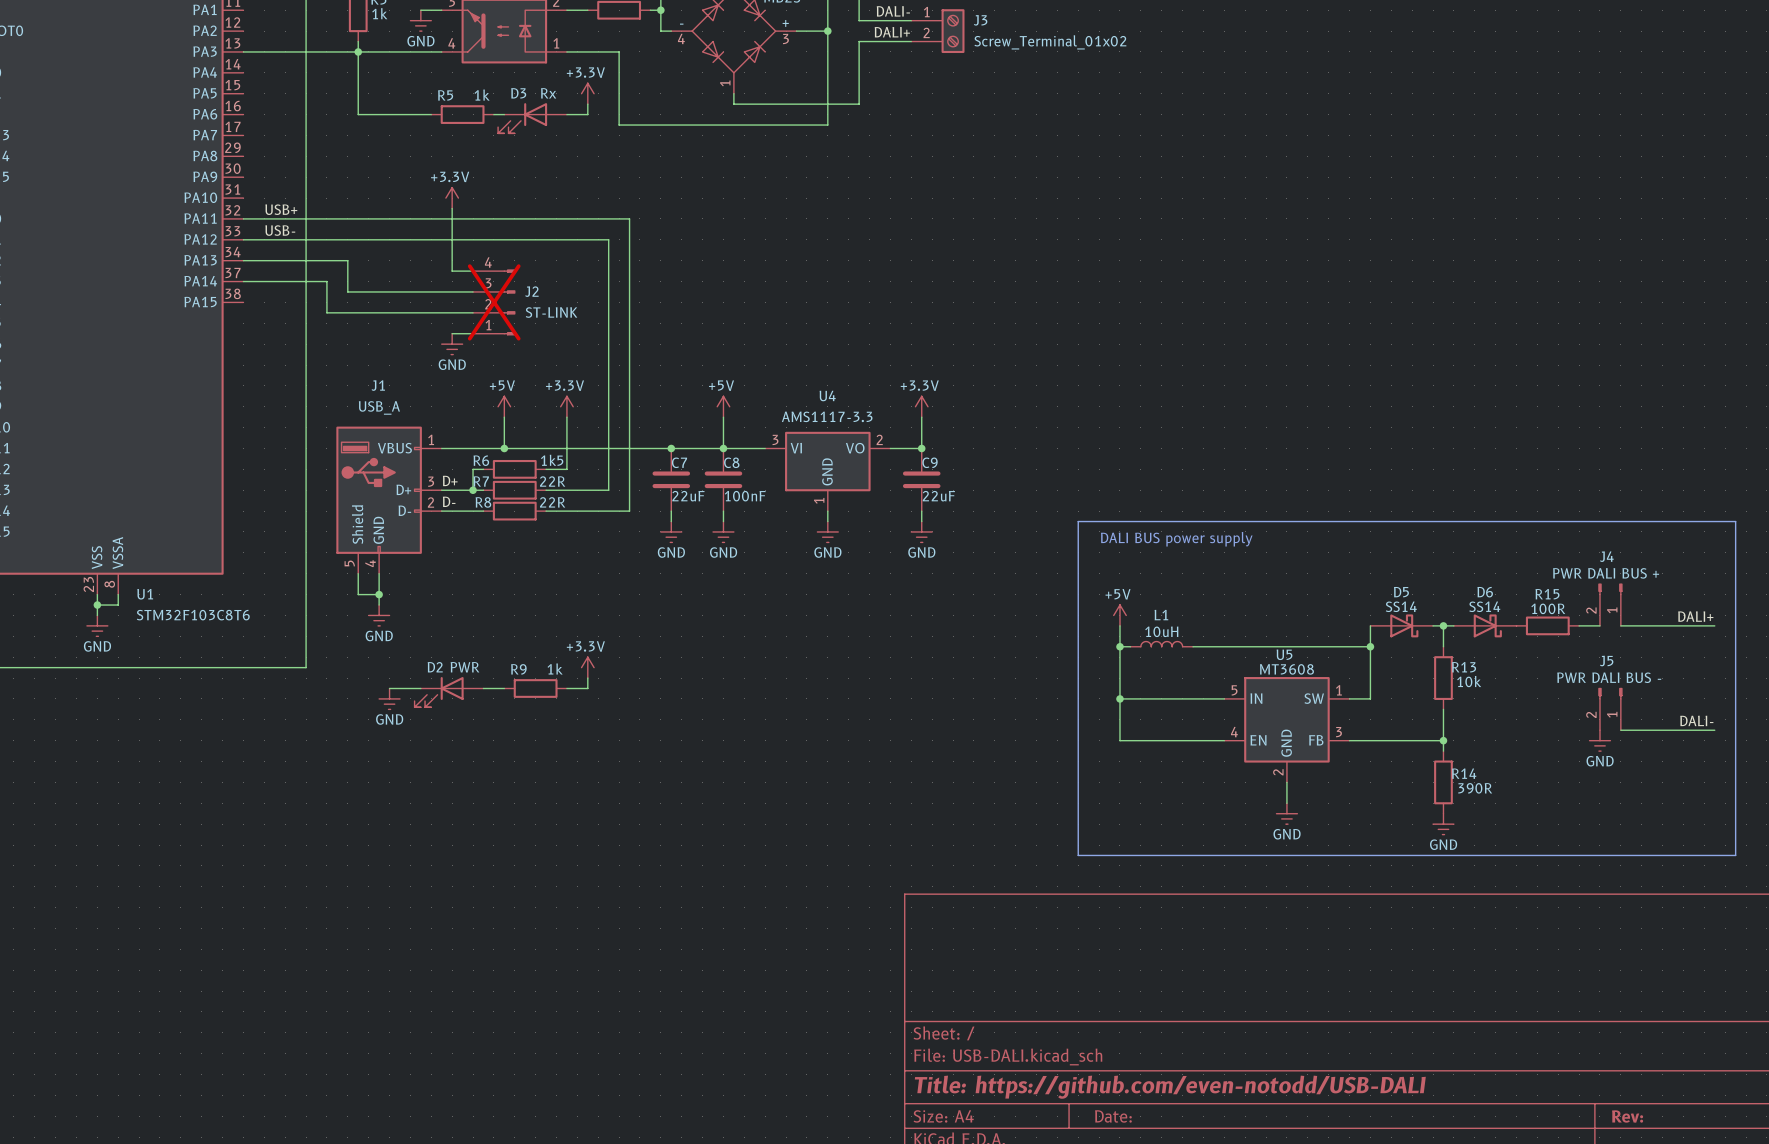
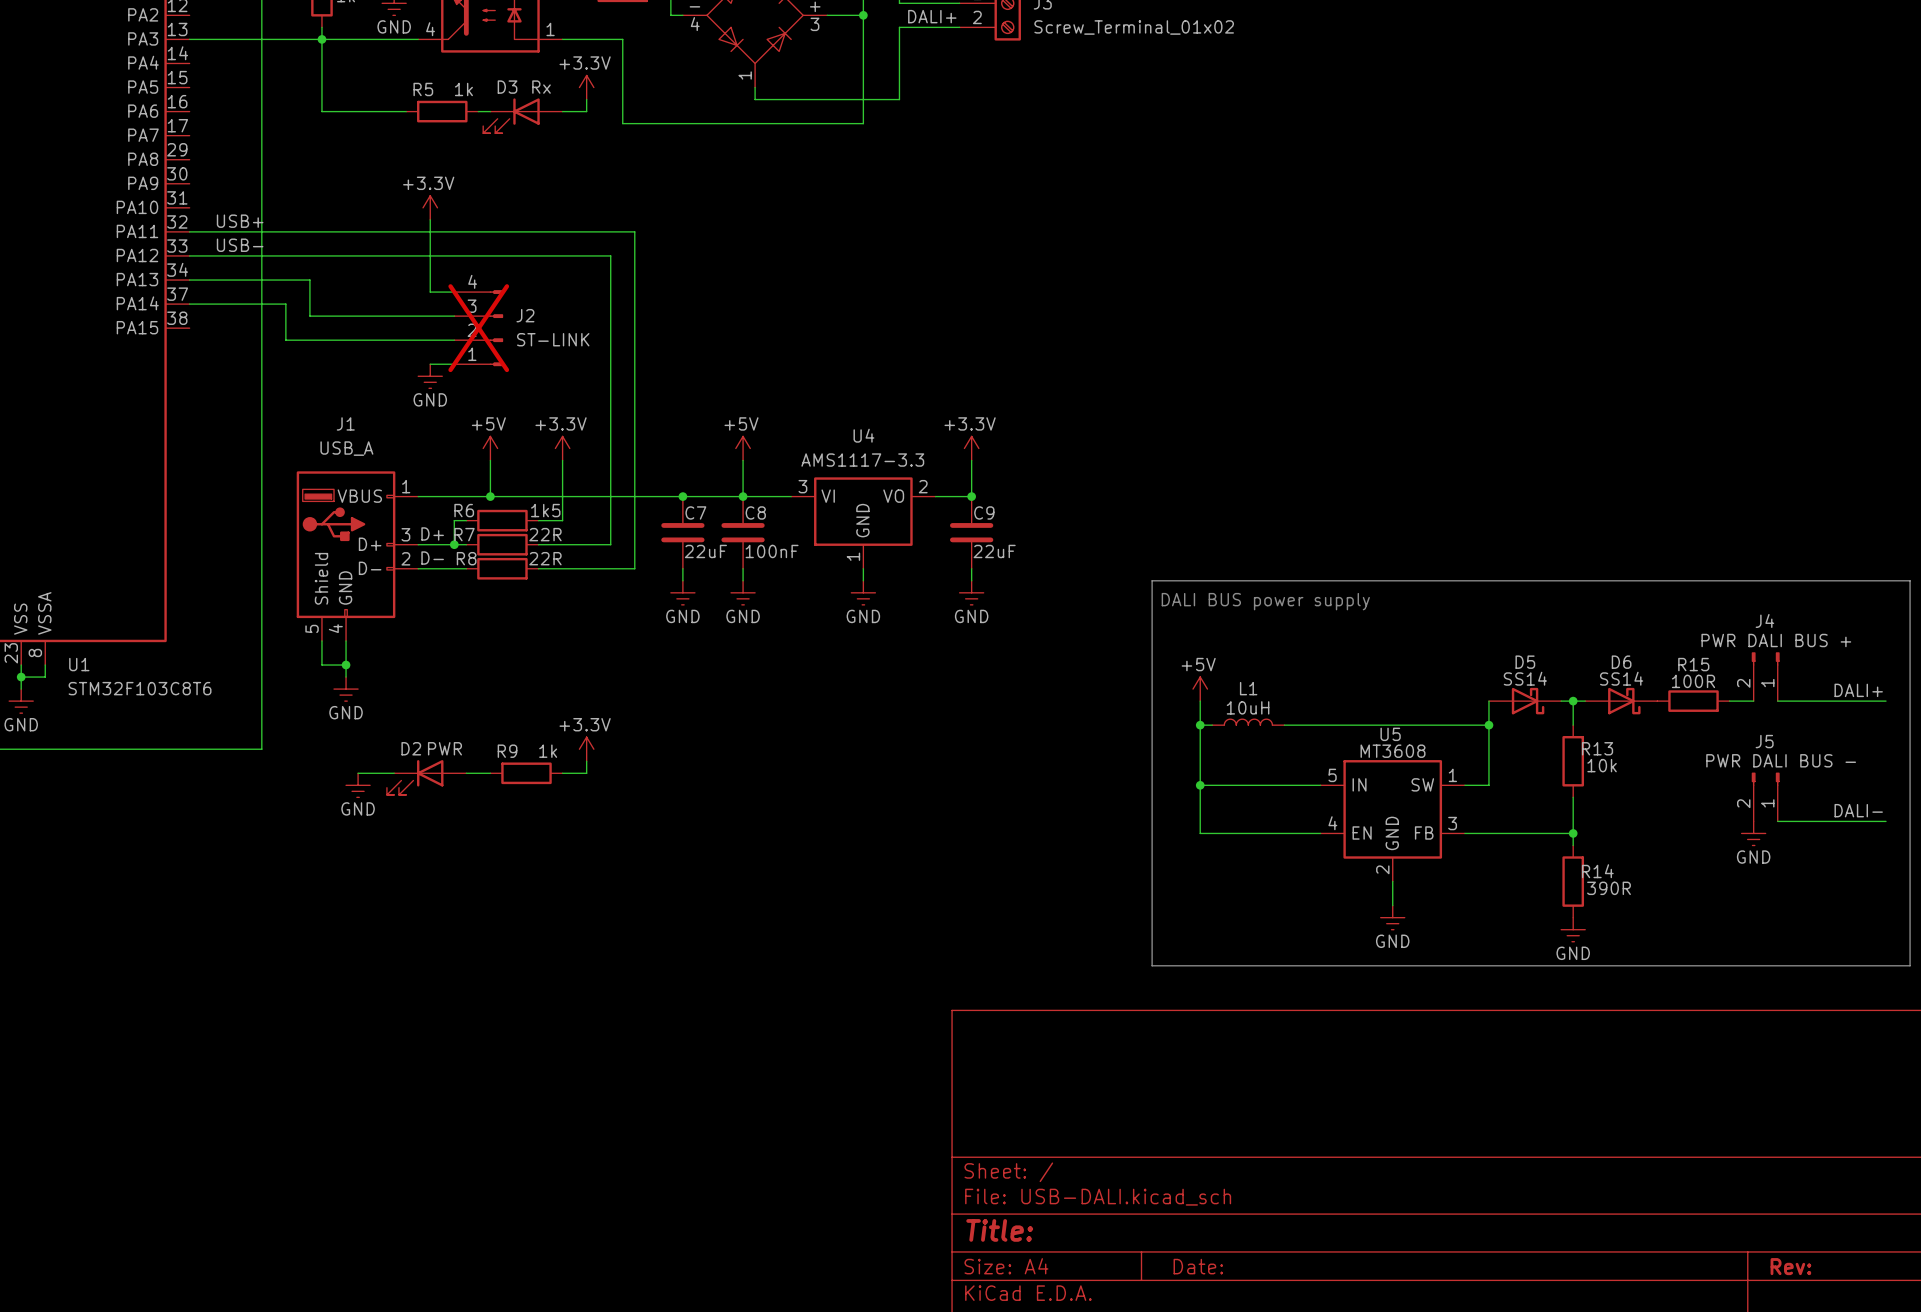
title block: Title: https://github.com/even-notodd/USB-DALI (1170, 1087) -> Title: (999, 1230)

